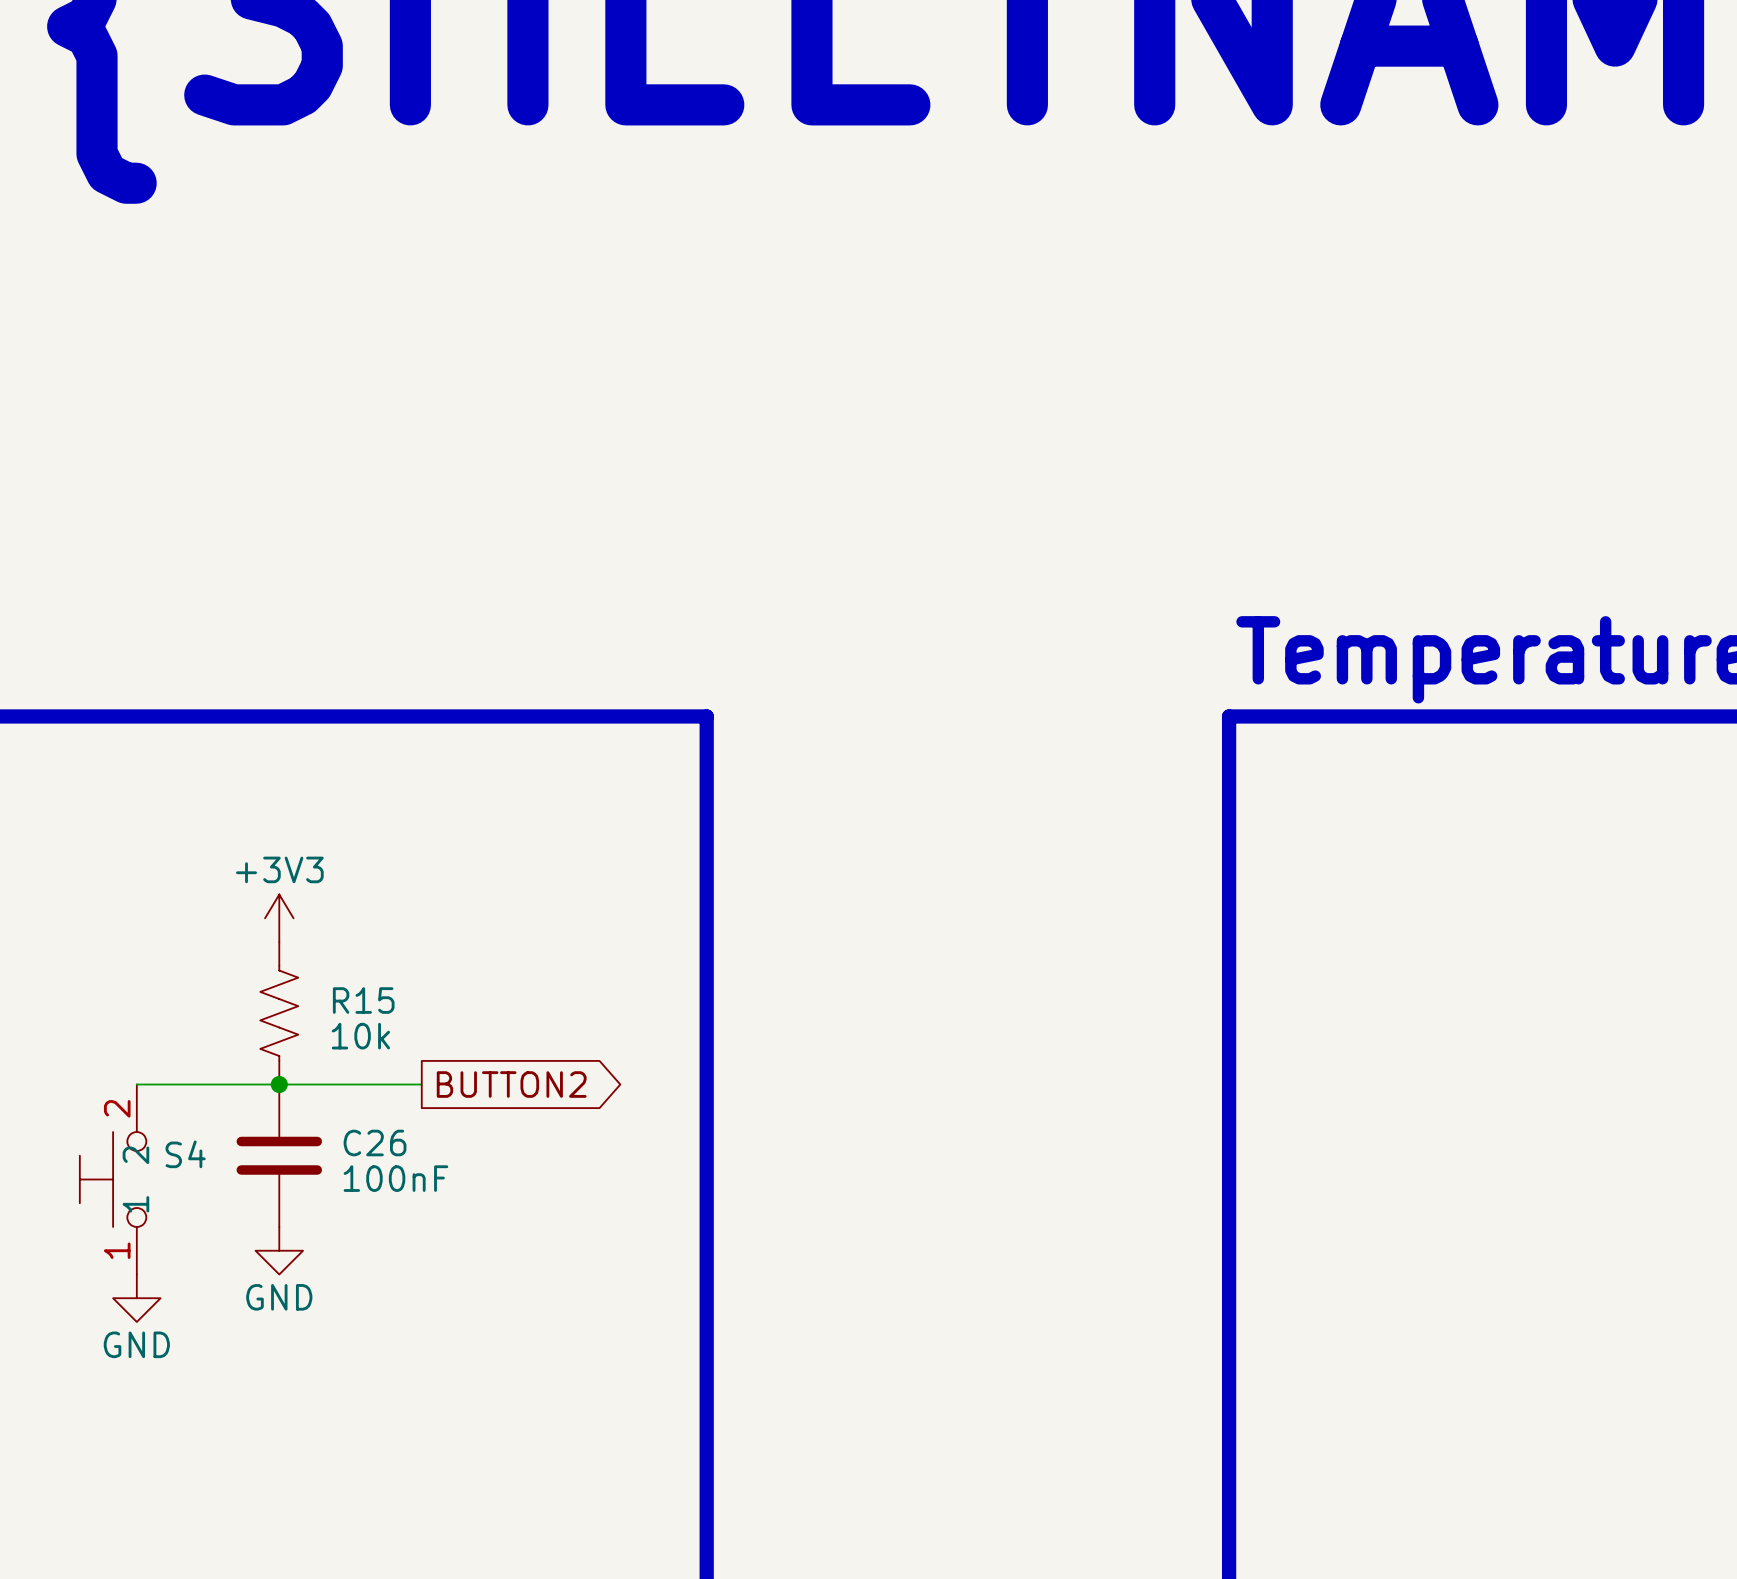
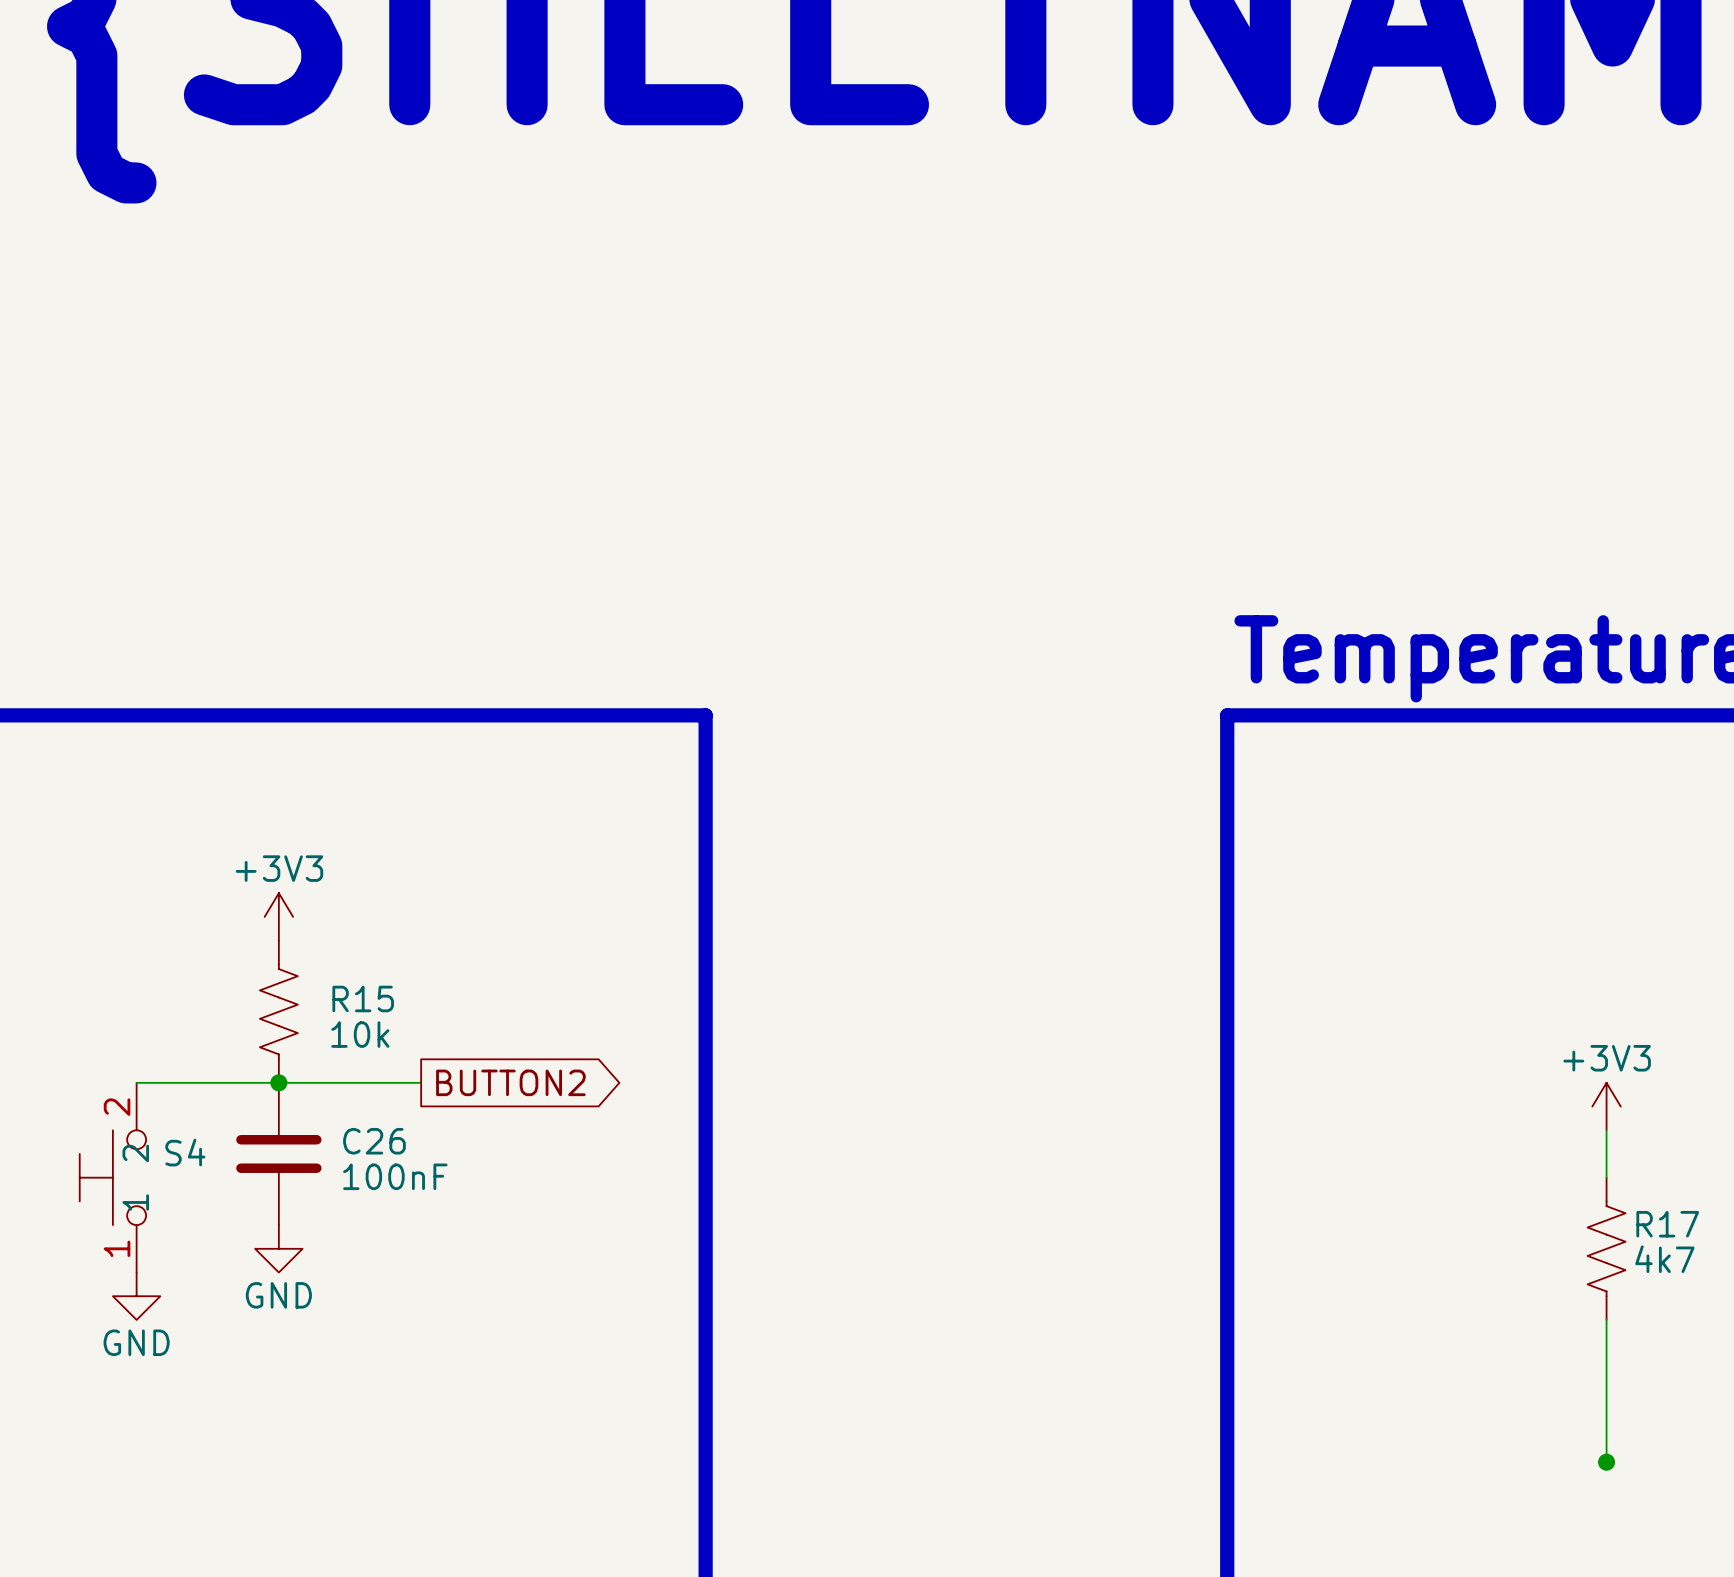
power symbol: none -> +3V3 (1606, 1106)
wire: none -> (1606, 1130) (1606, 1177)
R17: none -> 4k7 (1606, 1248)
wire: none -> (1606, 1319) (1606, 1462)
junction: none -> (1606, 1462)

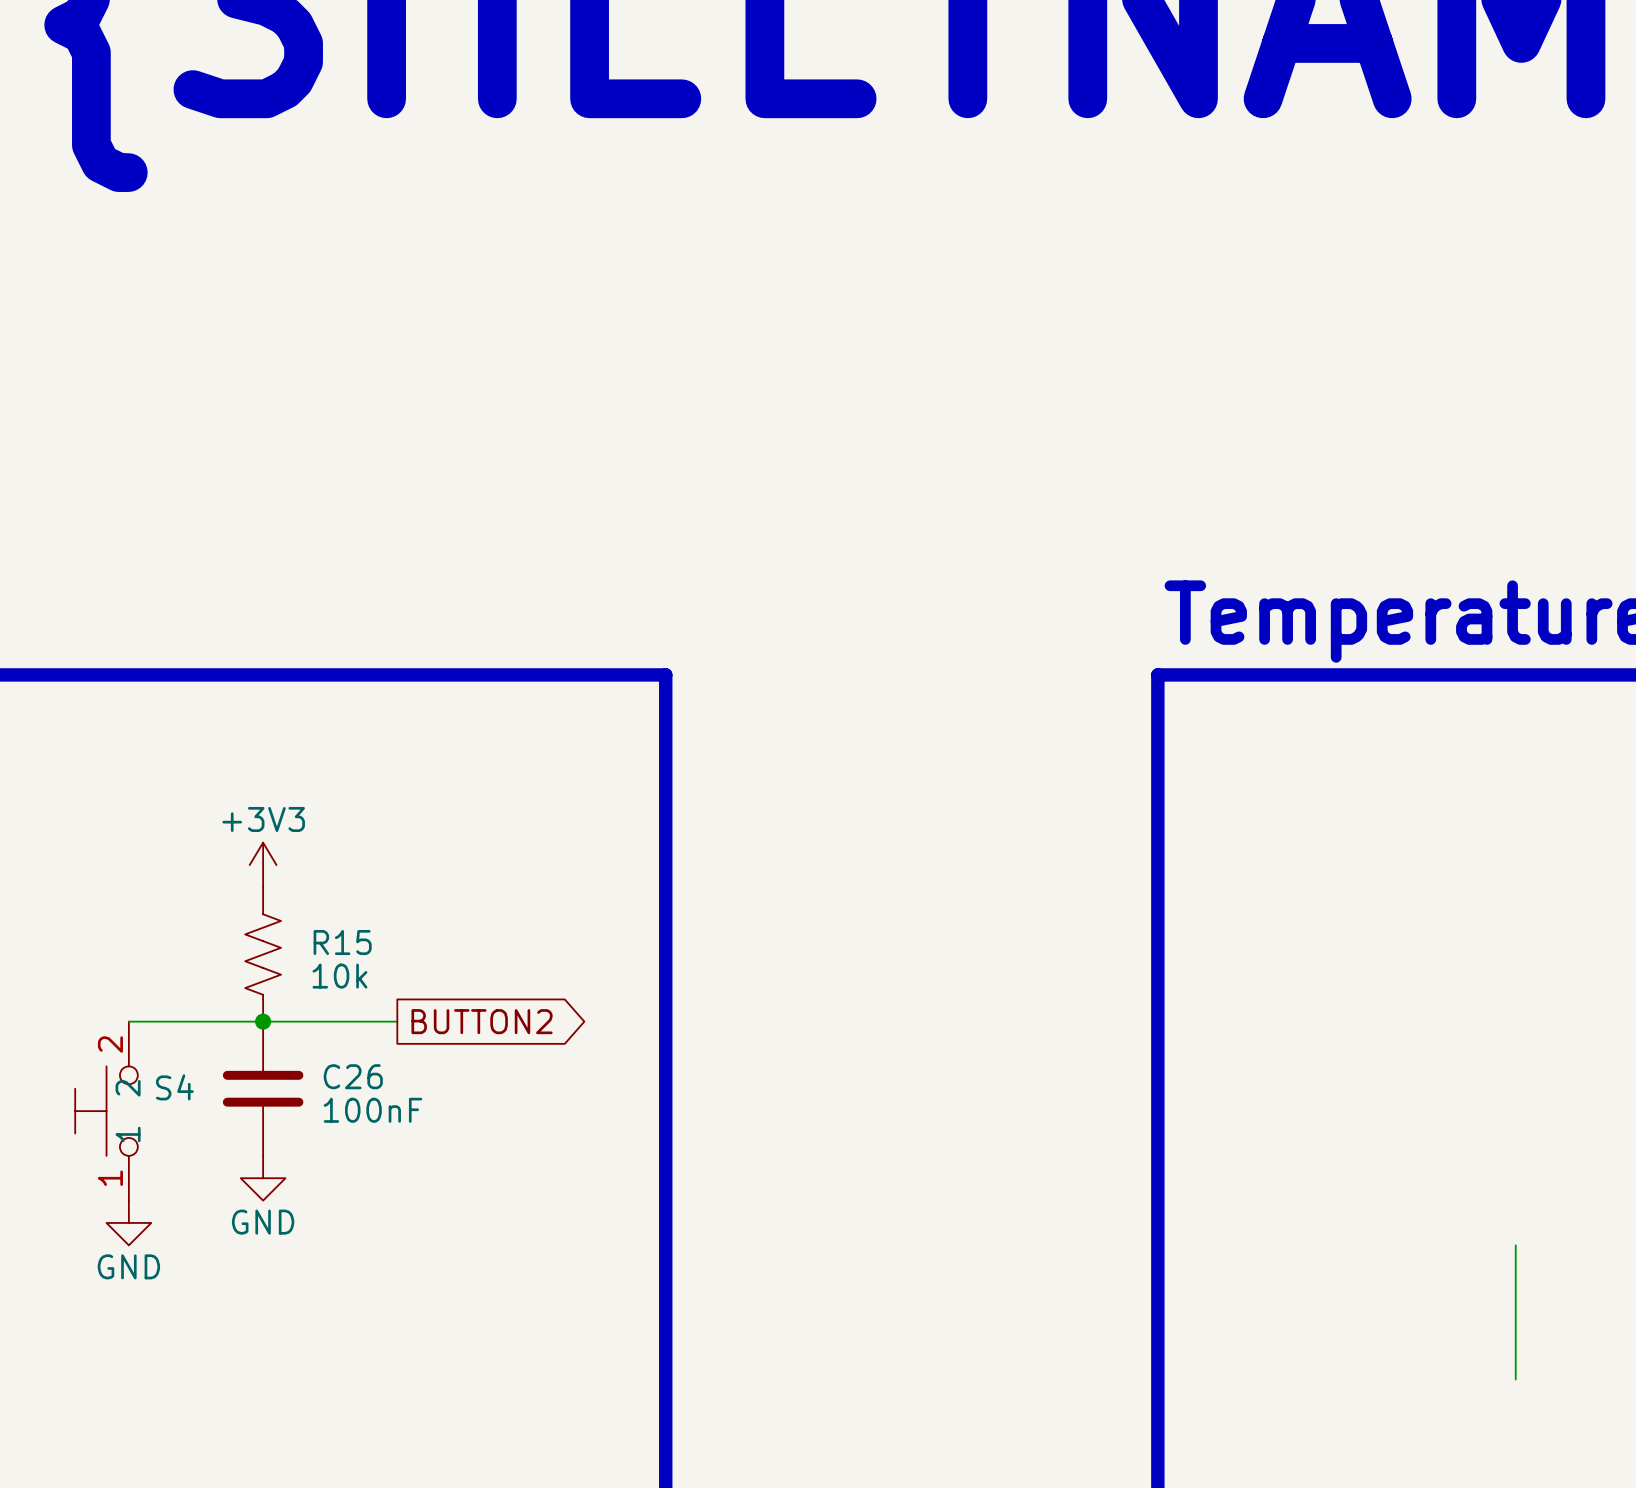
power symbol: +3V3 (1606, 1106) -> none
wire: (1606, 1130) (1606, 1177) -> none
R17: 4k7 (1606, 1248) -> none
junction: (1606, 1462) -> none

